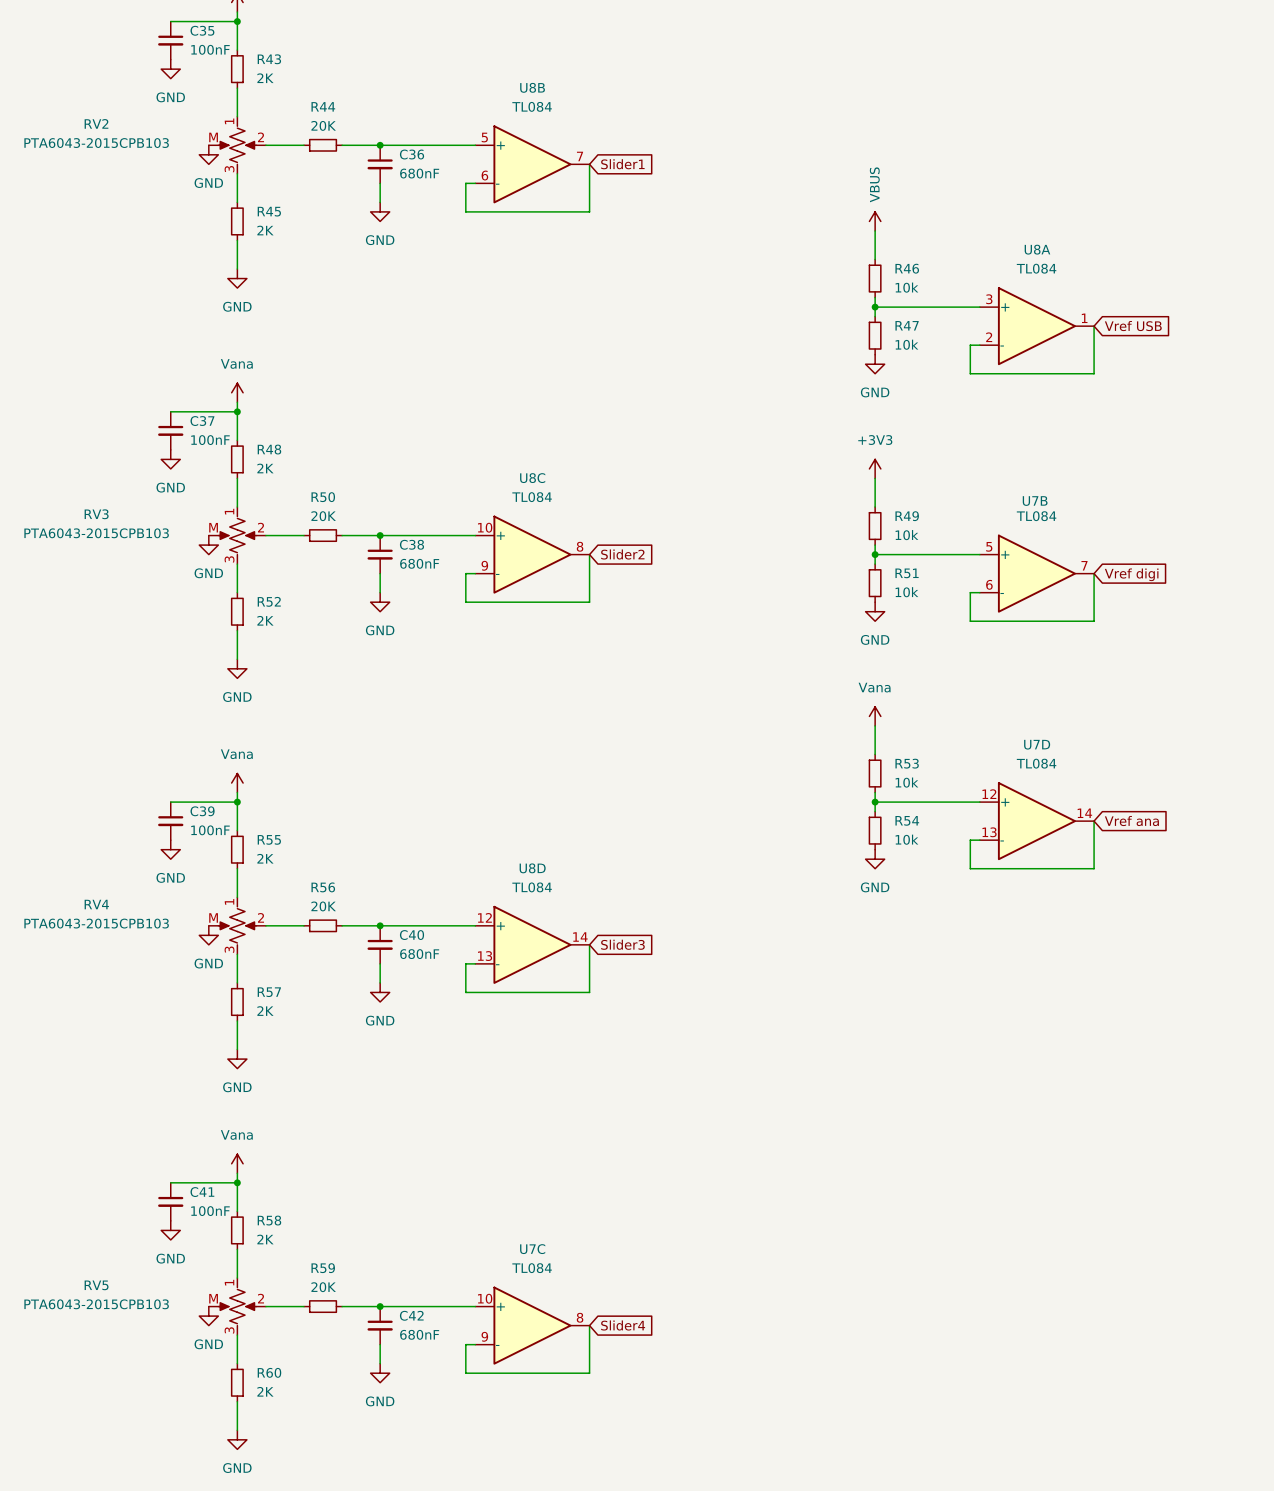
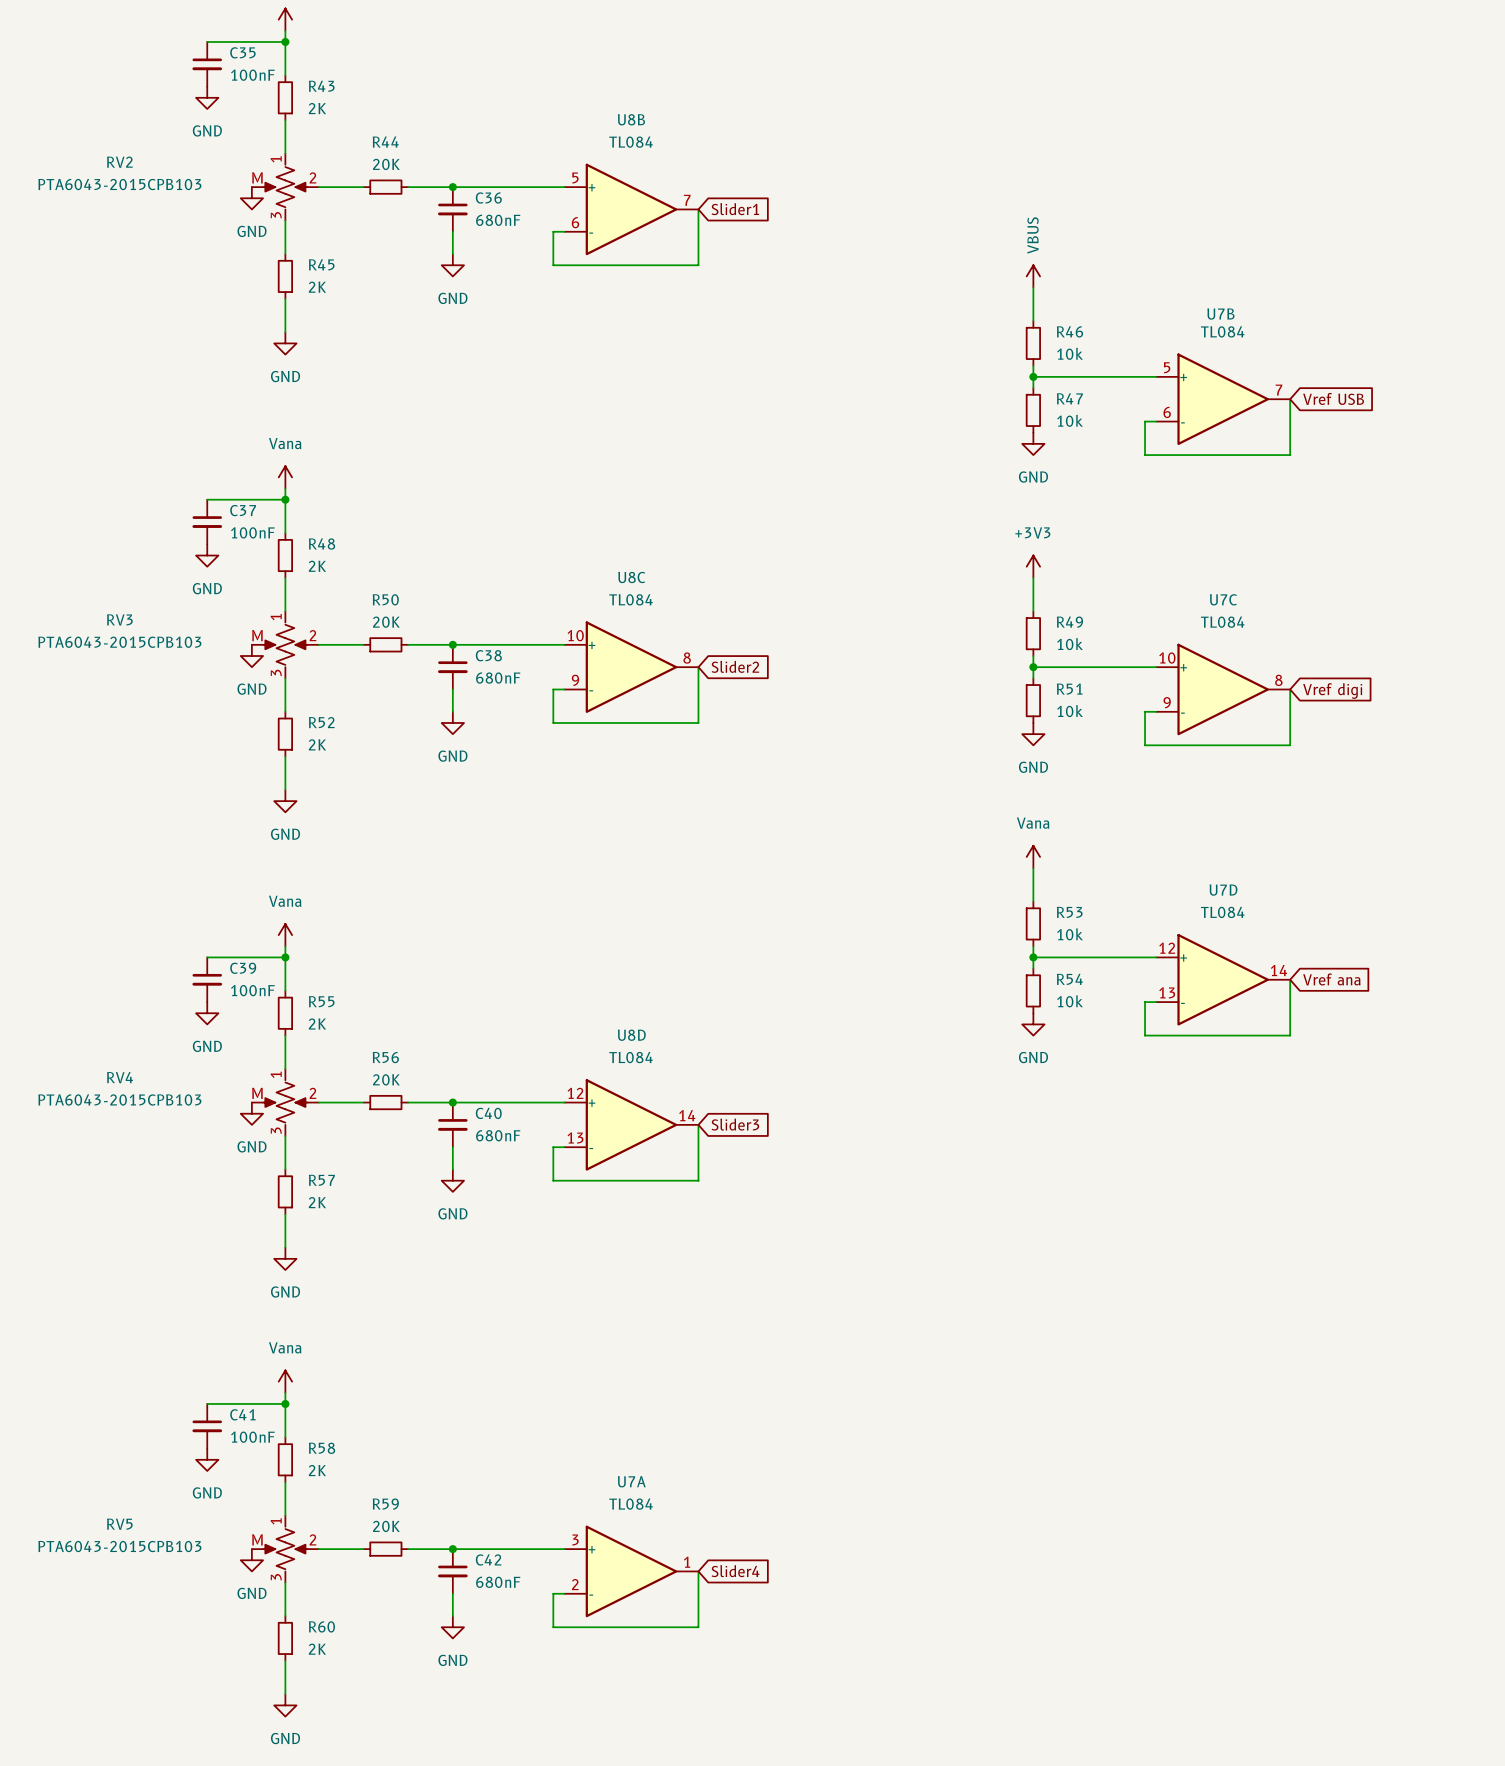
U8A: TL084 (1036, 326) -> none
U7B position: (1036, 573) -> (1223, 399)
U7C position: (532, 1325) -> (1223, 689)
U7A: none -> TL084 (631, 1571)

